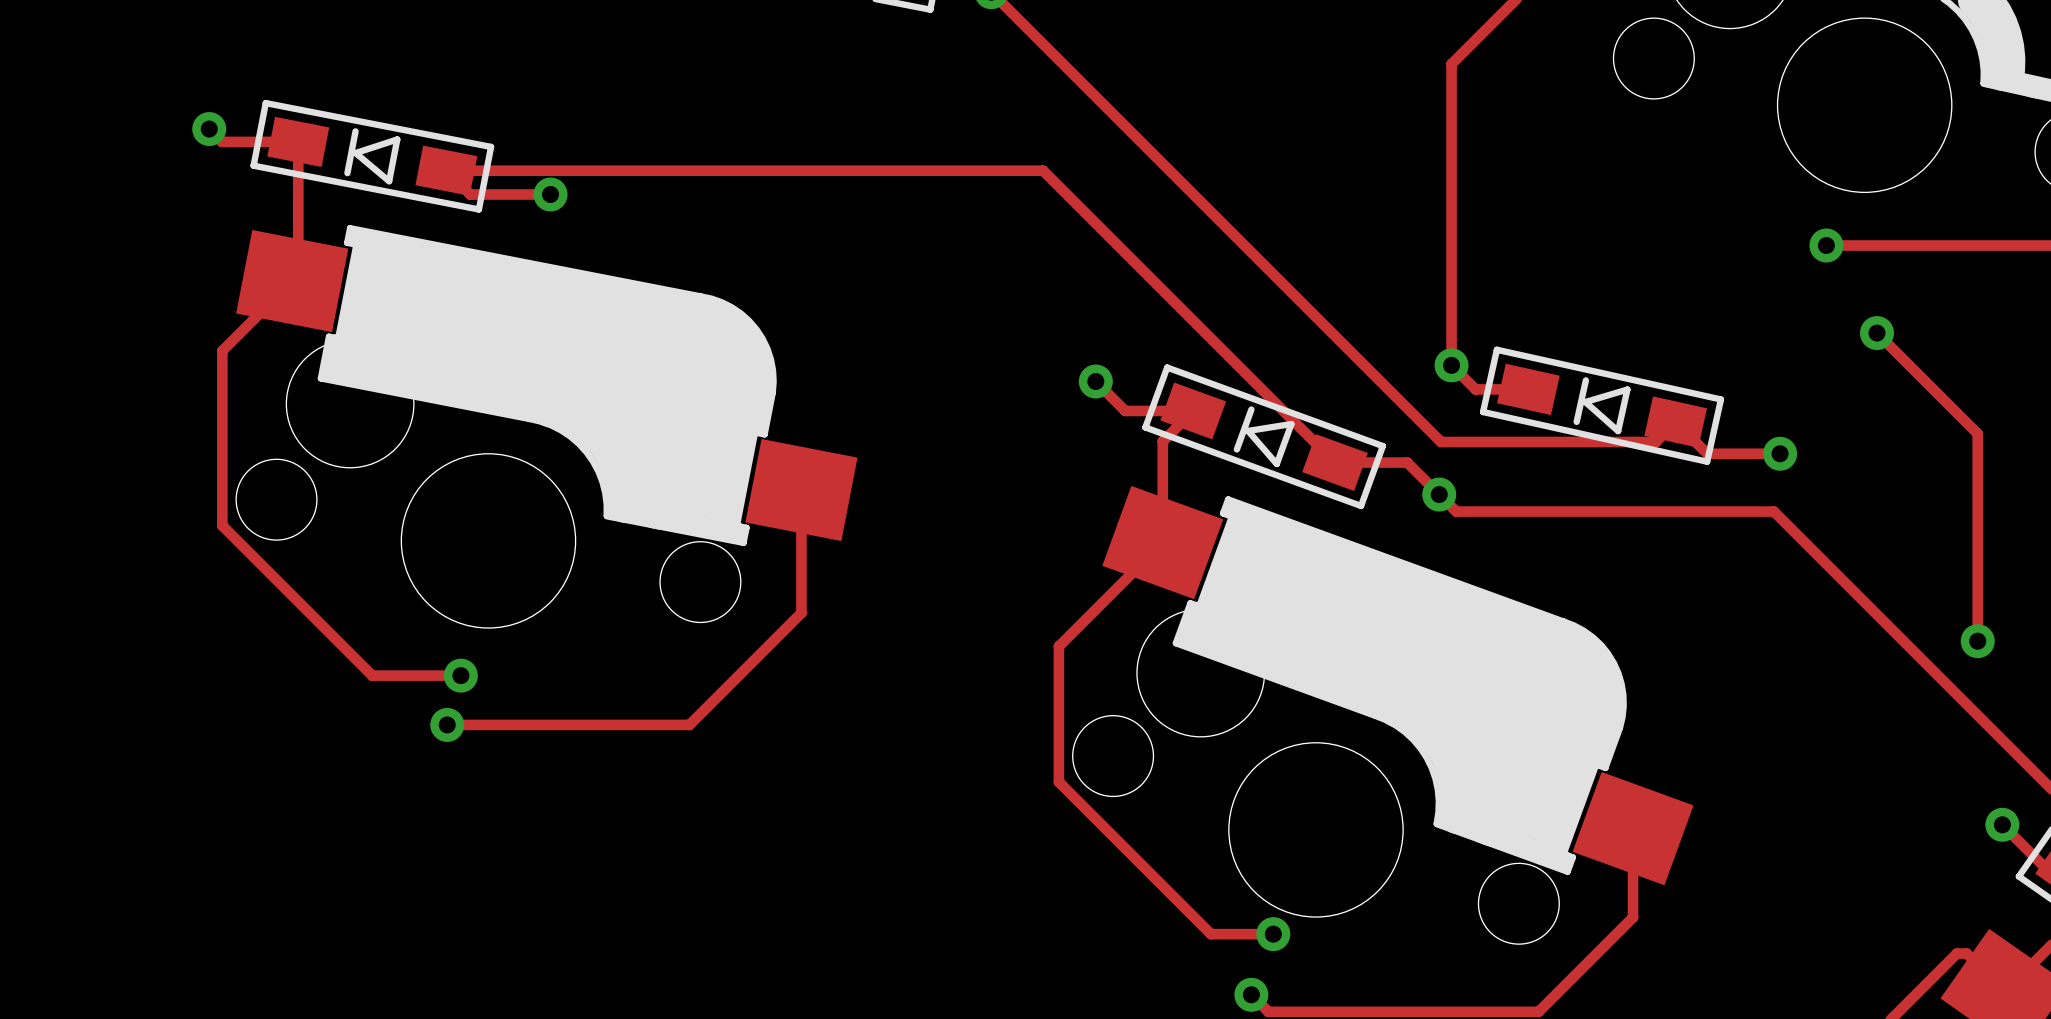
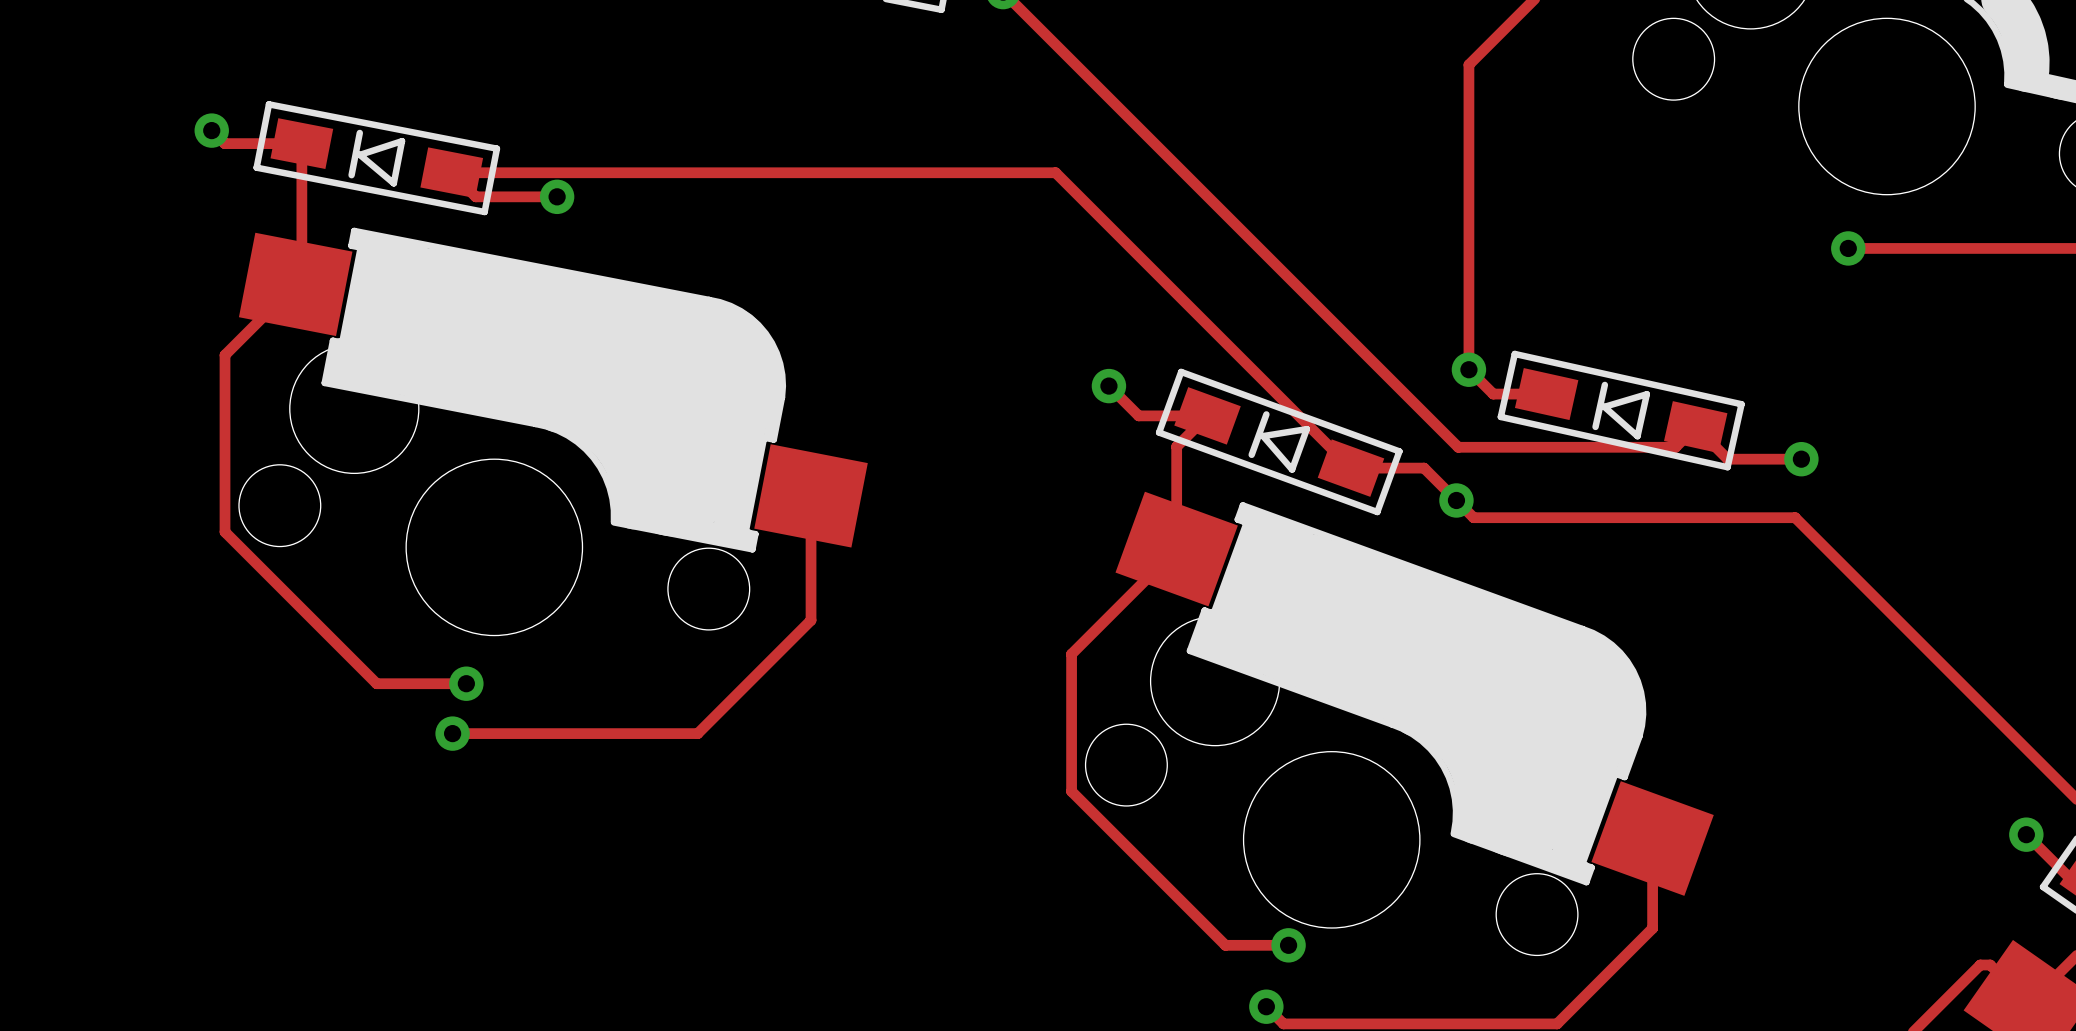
track: (1877, 333) (1977, 433) (1977, 641) -> none
via: (1877, 333) -> none
via: (1977, 641) -> none

